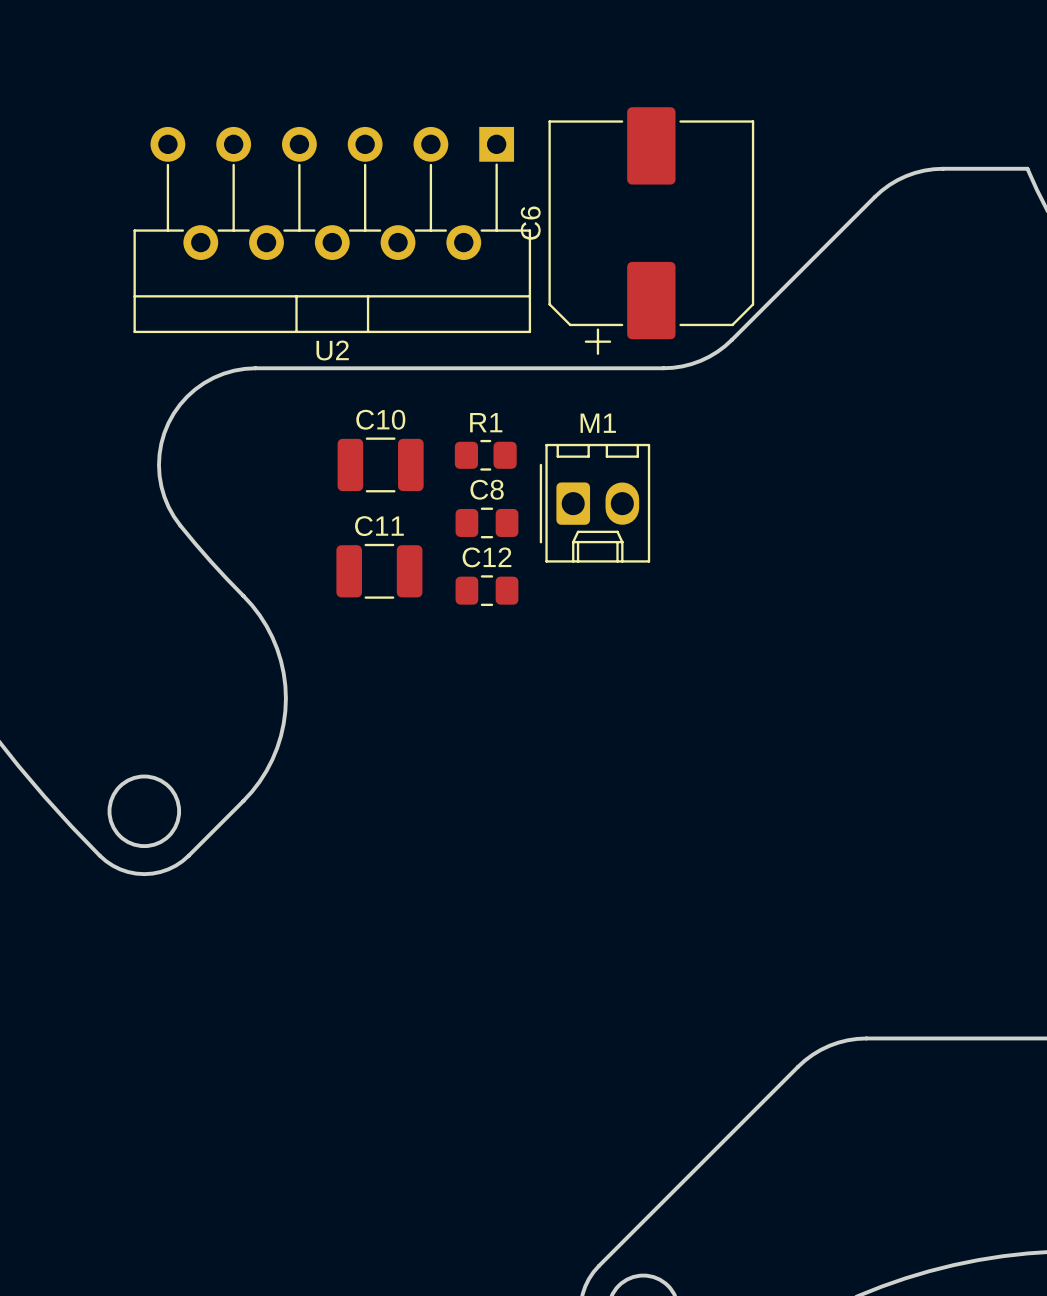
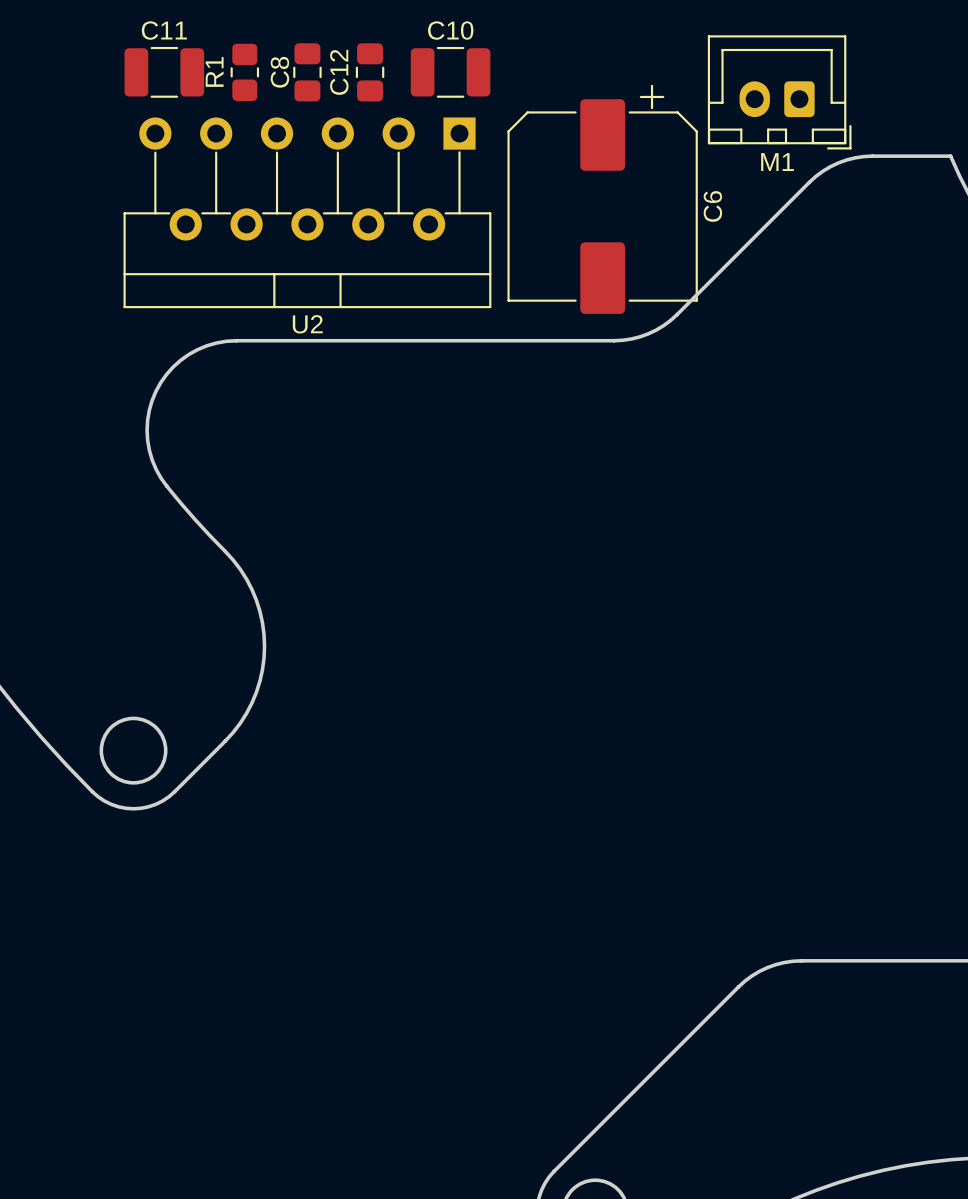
C6 rotation: 0° (651, 231) -> 180° (602, 199)
R1 name position: R1 (486, 422) -> R1 (214, 71)
M1 name position: M1 (598, 423) -> M1 (777, 162)
M1 footprint: [539, 443, 651, 563] -> [707, 35, 852, 150]
R1 rotation: 0° (485, 455) -> 90° clockwise (244, 72)
R1 position: (485, 455) -> (244, 72)
C10 position: (380, 464) -> (450, 72)
C8 name position: C8 (487, 489) -> C8 (279, 72)
C8 rotation: 0° (486, 522) -> 90° clockwise (307, 72)
C8 position: (486, 522) -> (307, 72)
C12 name position: C12 (486, 557) -> C12 (339, 72)
C11 position: (379, 571) -> (164, 72)
C12 rotation: 0° (486, 590) -> 90° clockwise (370, 72)
C12 position: (486, 590) -> (370, 72)

